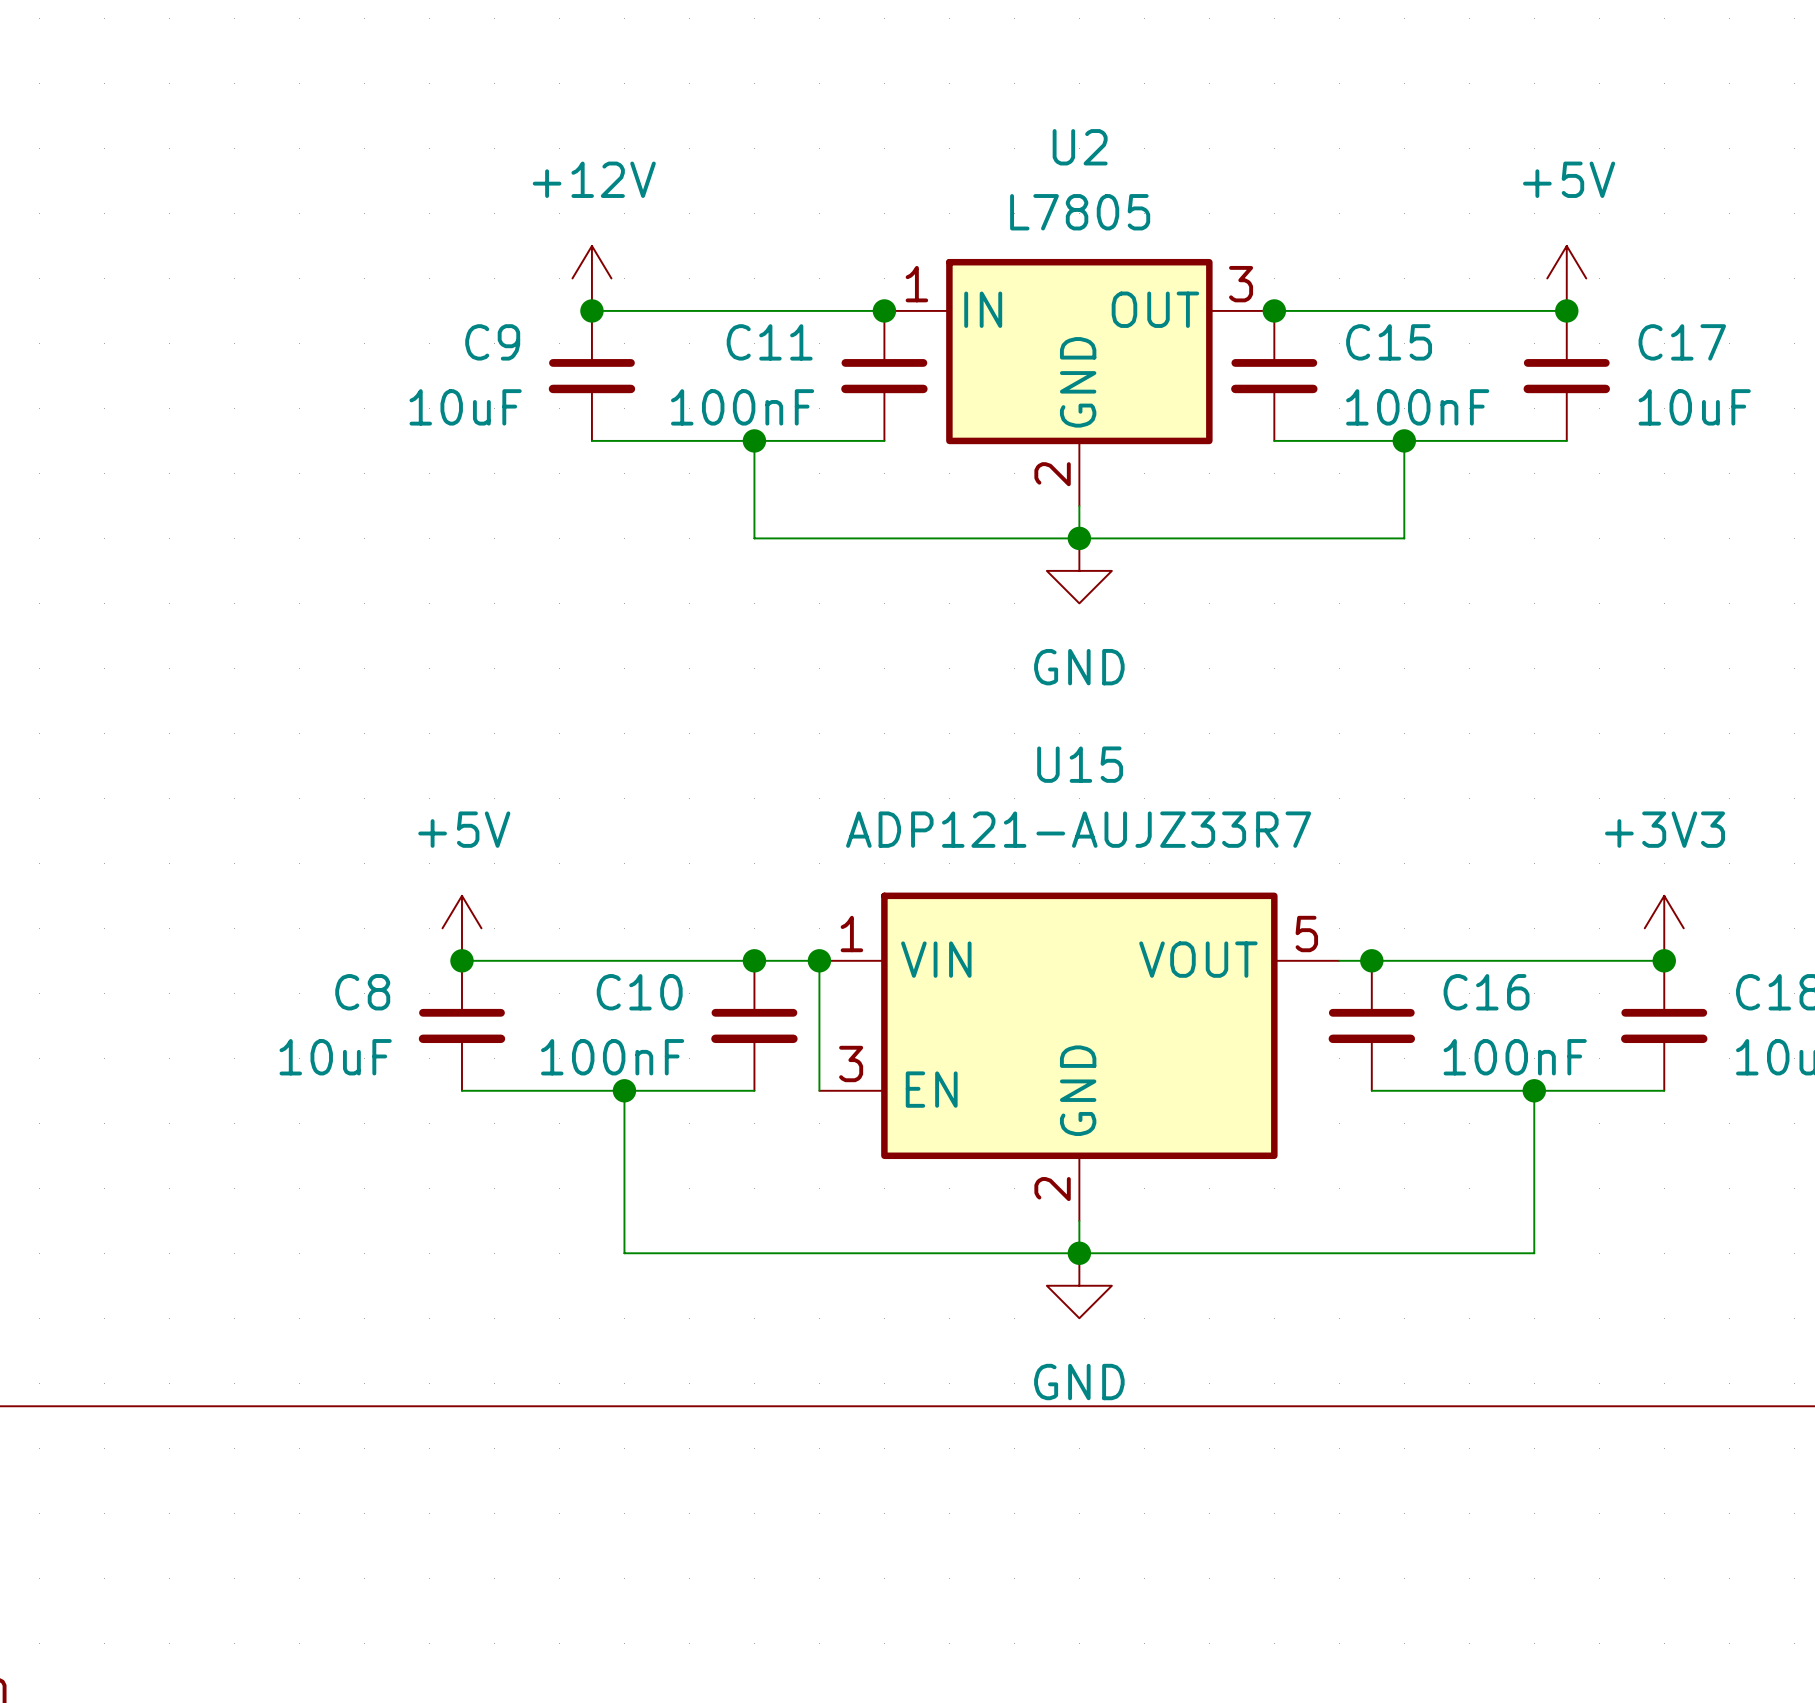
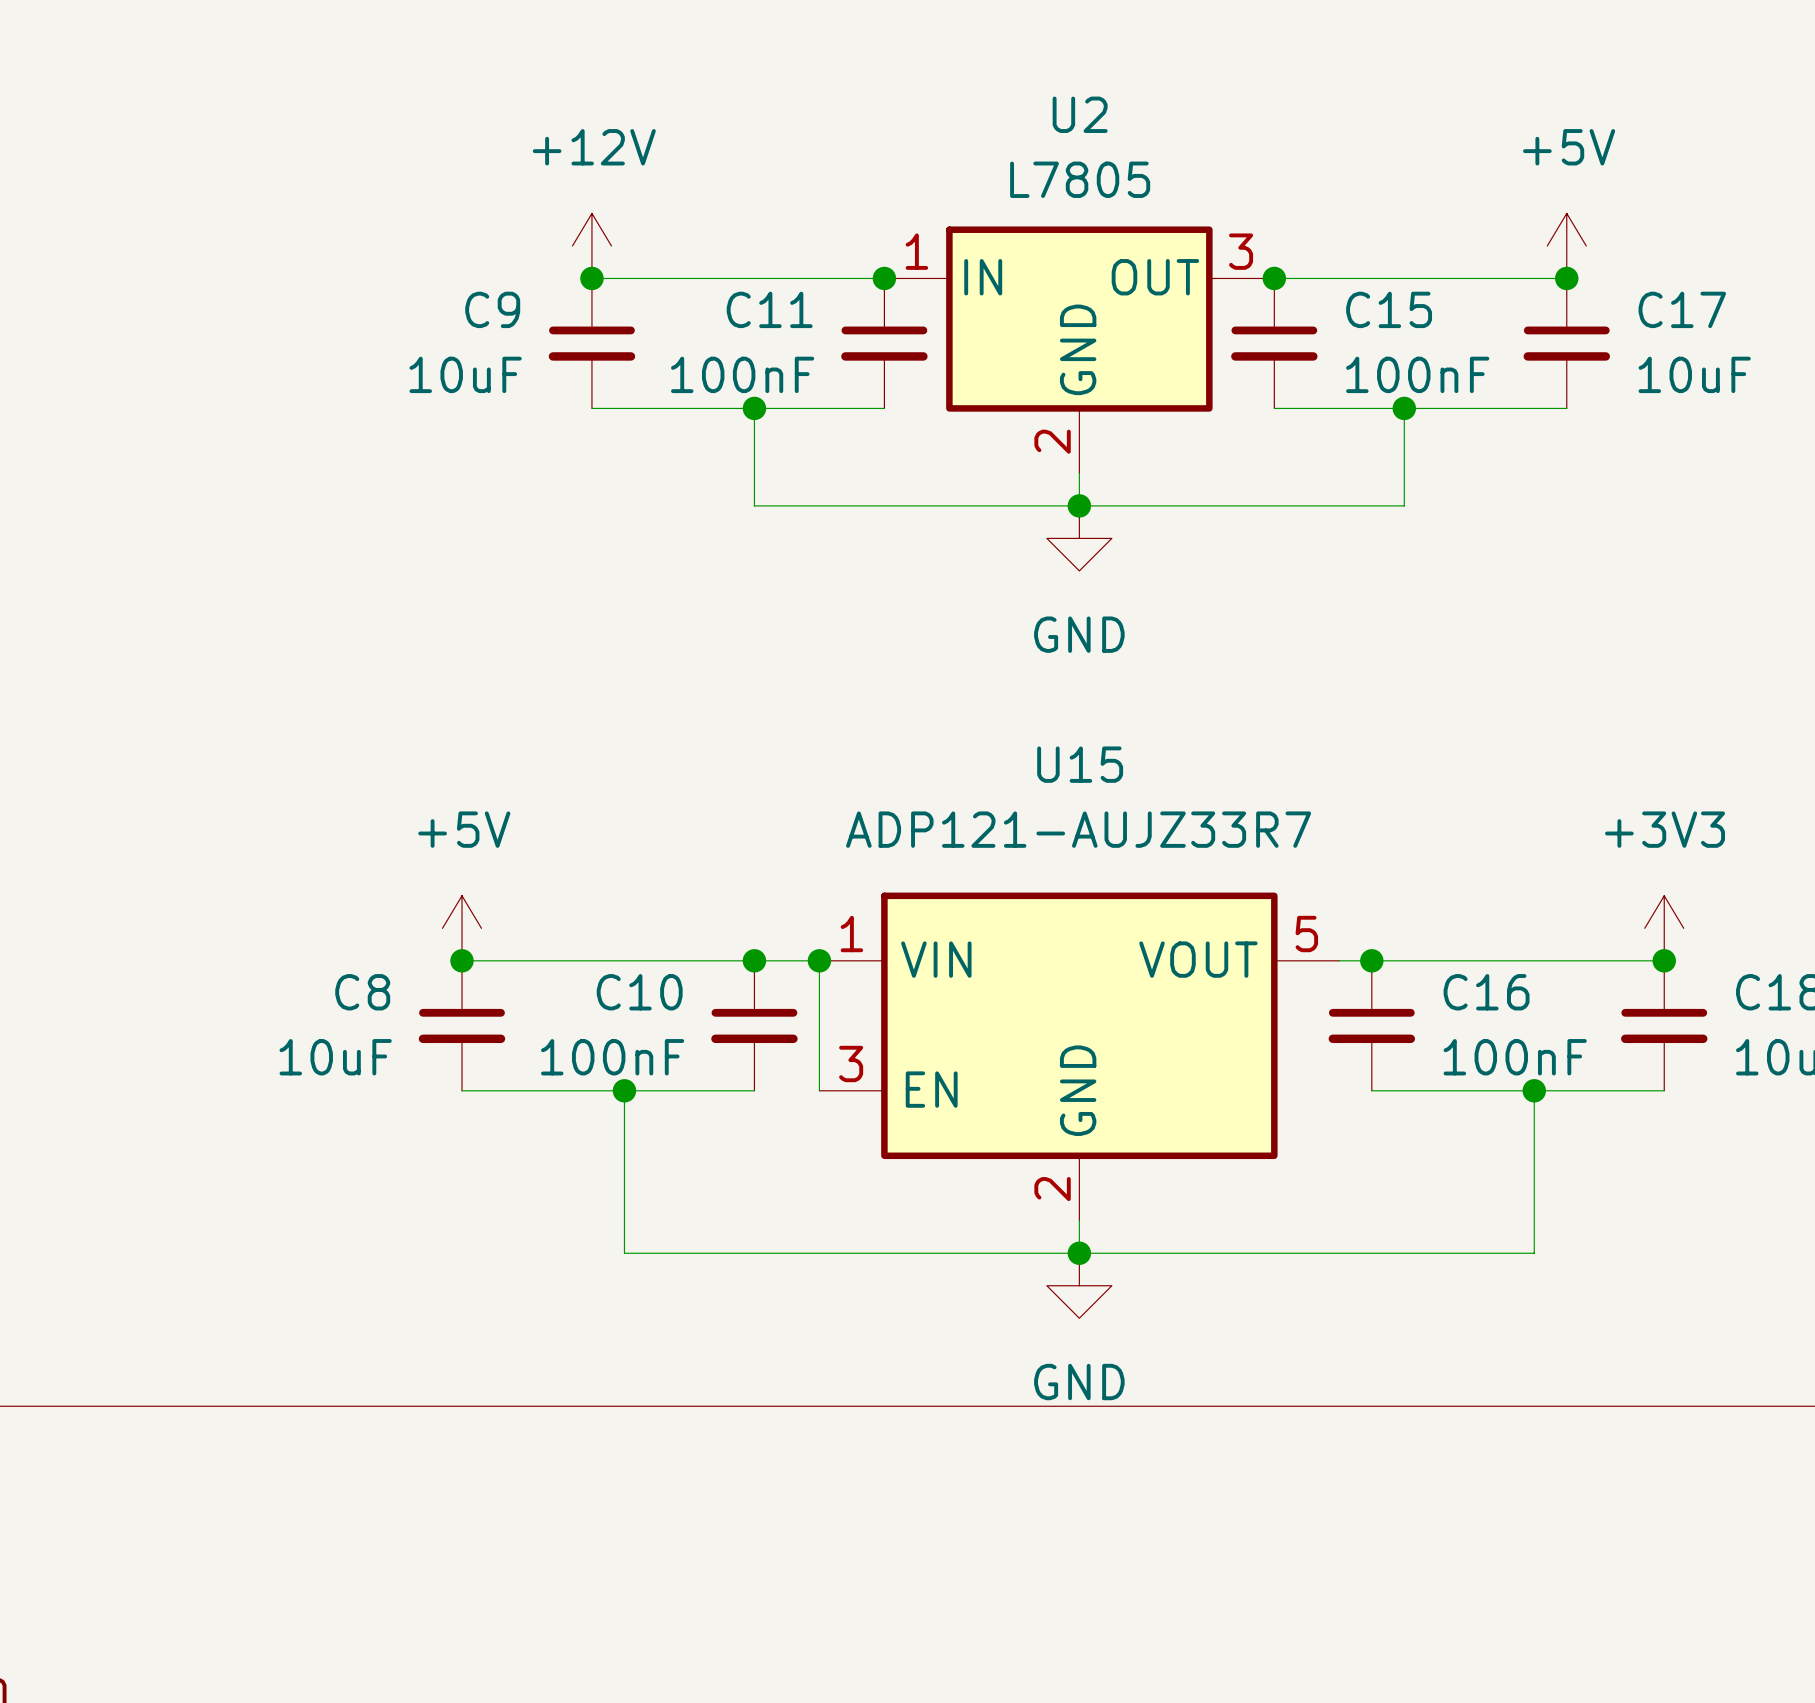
power symbol position: +12V (591, 278) -> +12V (591, 245)
power symbol position: +5V (1566, 278) -> +5V (1566, 245)
wire: (591, 310) (884, 310) -> (591, 278) (884, 278)
junction position: (591, 310) -> (591, 278)
junction position: (884, 310) -> (884, 278)
wire: (1274, 310) (1566, 310) -> (1274, 278) (1566, 278)
junction position: (1274, 310) -> (1274, 278)
junction position: (1566, 310) -> (1566, 278)
C9 position: (591, 375) -> (591, 343)
C11 position: (884, 375) -> (884, 343)
C15 position: (1274, 375) -> (1274, 343)
C17 position: (1566, 375) -> (1566, 343)
U2 position: (1079, 382) -> (1079, 349)
wire: none -> (1404, 408) (1404, 440)
wire: (591, 440) (884, 440) -> (591, 408) (884, 408)
junction position: (754, 440) -> (754, 408)
wire: (1274, 440) (1566, 440) -> (1274, 408) (1566, 408)
junction position: (1404, 440) -> (1404, 408)
wire: (754, 505) (754, 538) (1404, 538) (1404, 505) -> (754, 505) (1404, 505)
junction position: (1079, 538) -> (1079, 505)
power symbol position: GND (1079, 570) -> GND (1079, 538)

